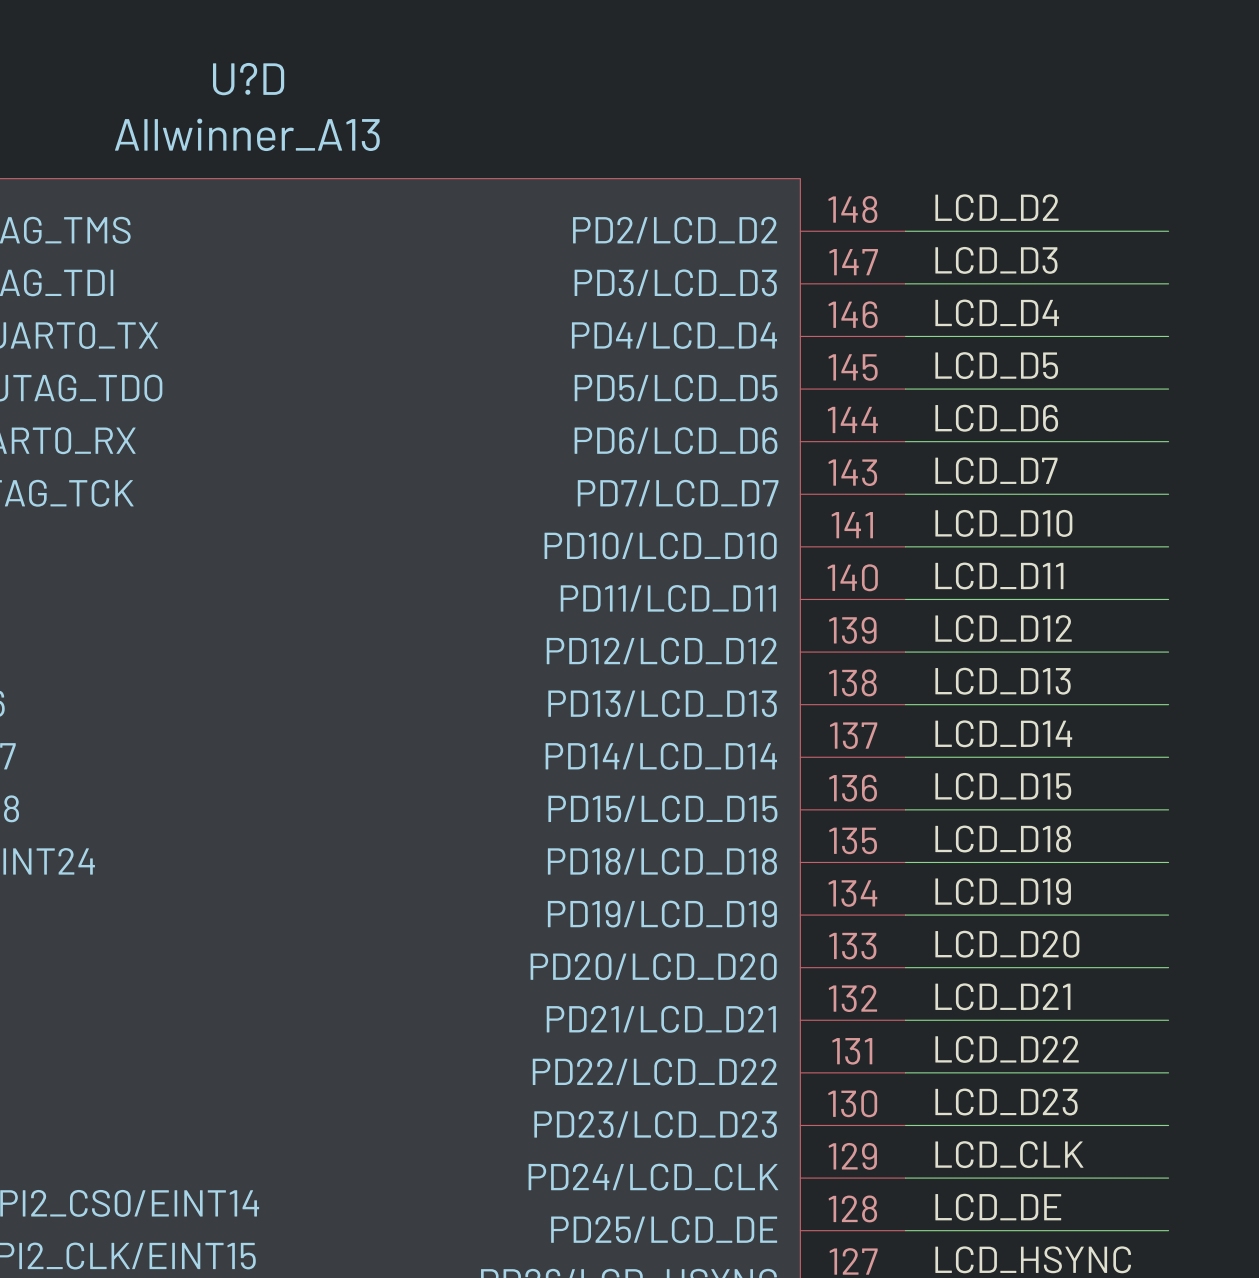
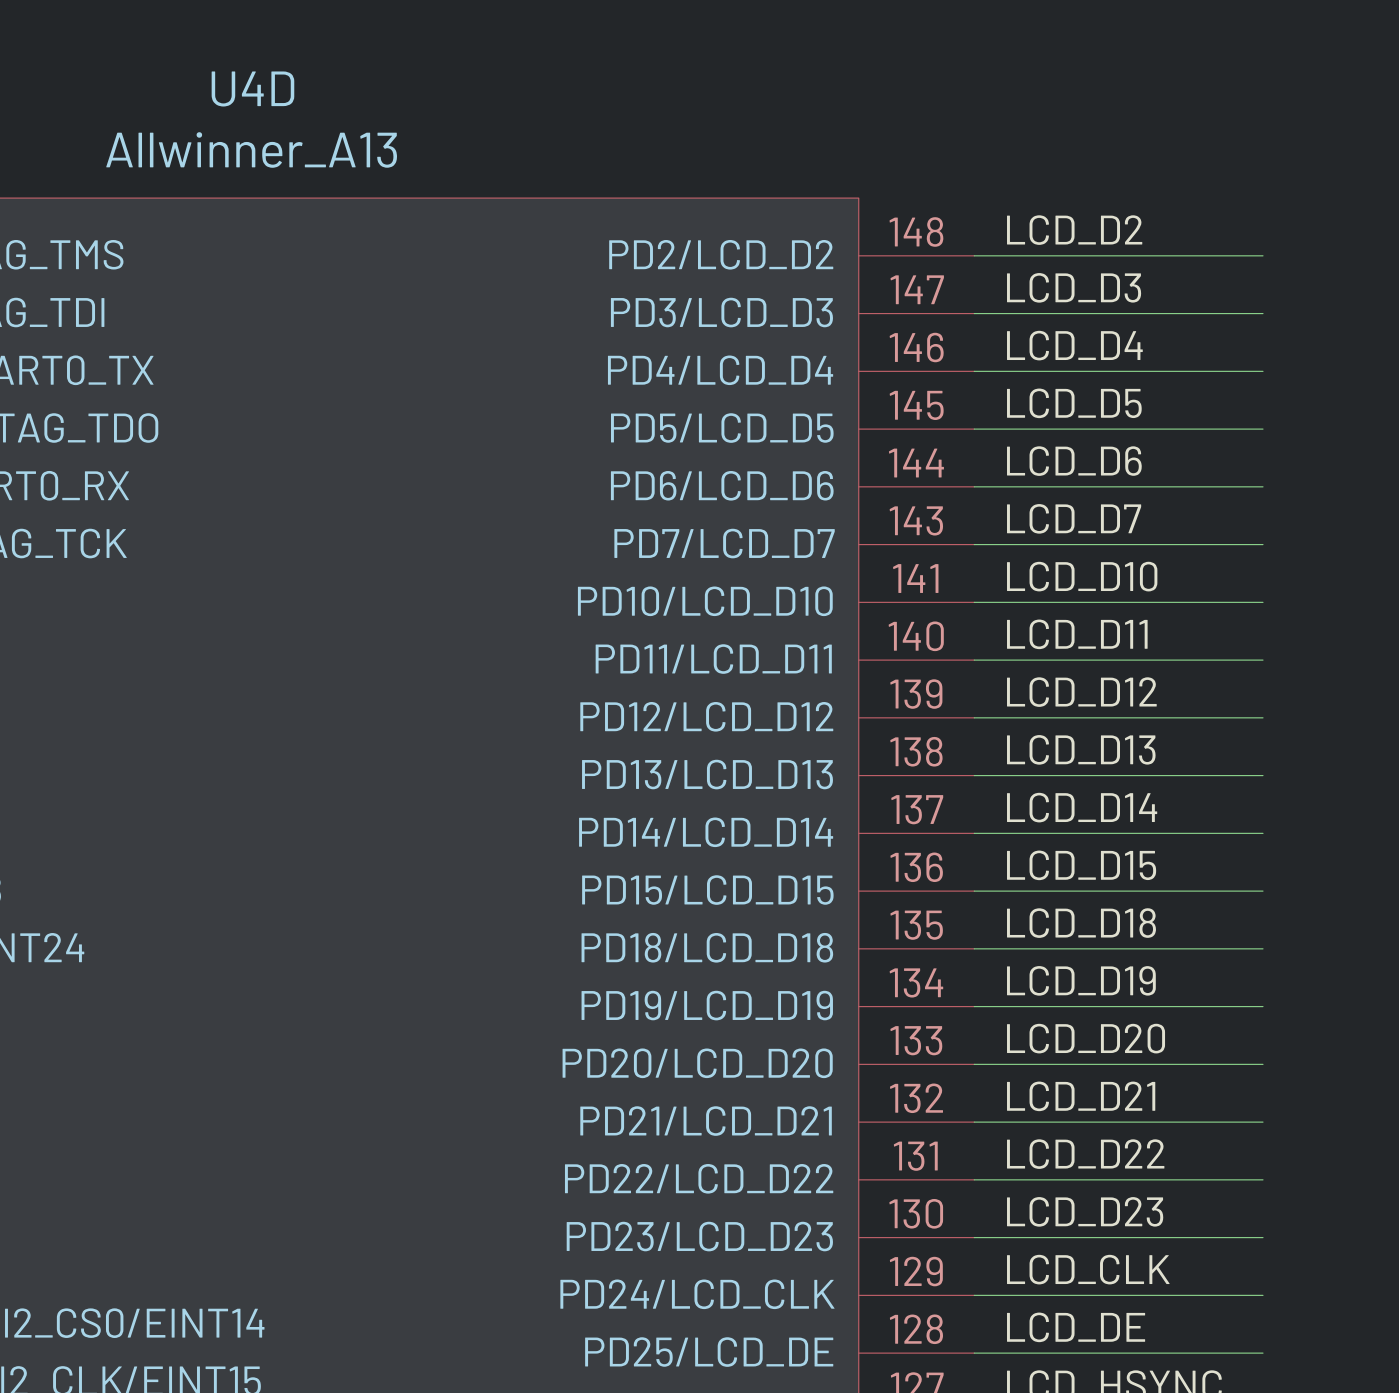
U?D name: U?D (248, 79) -> U4D (252, 88)

